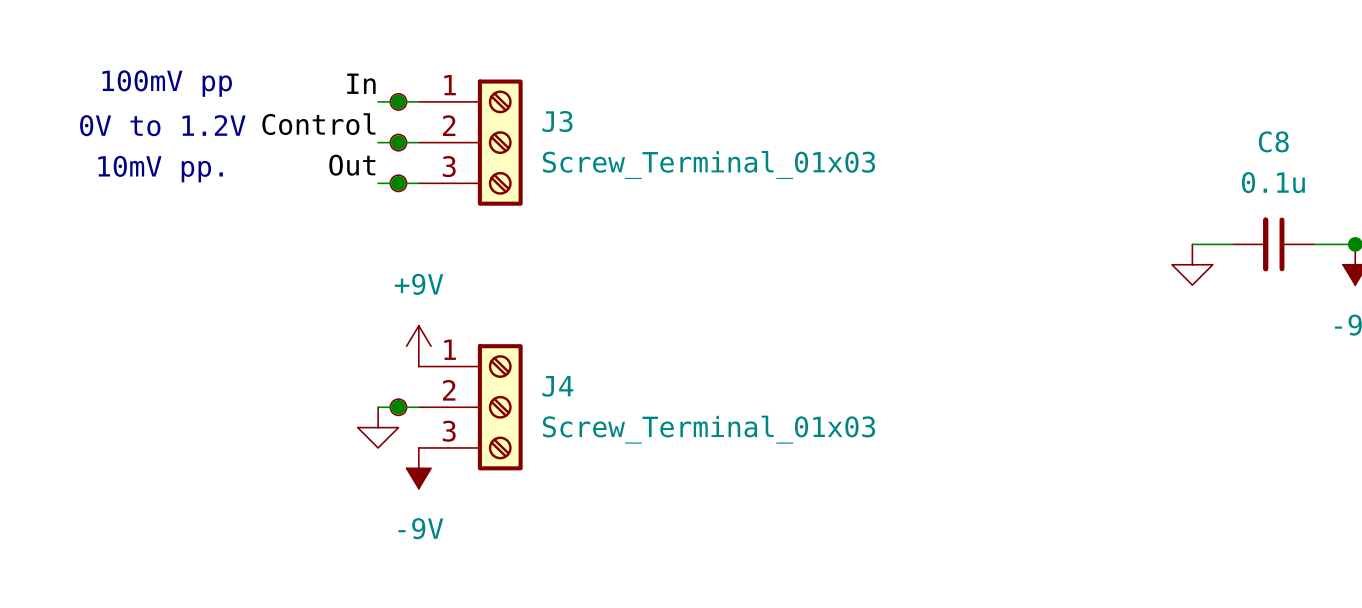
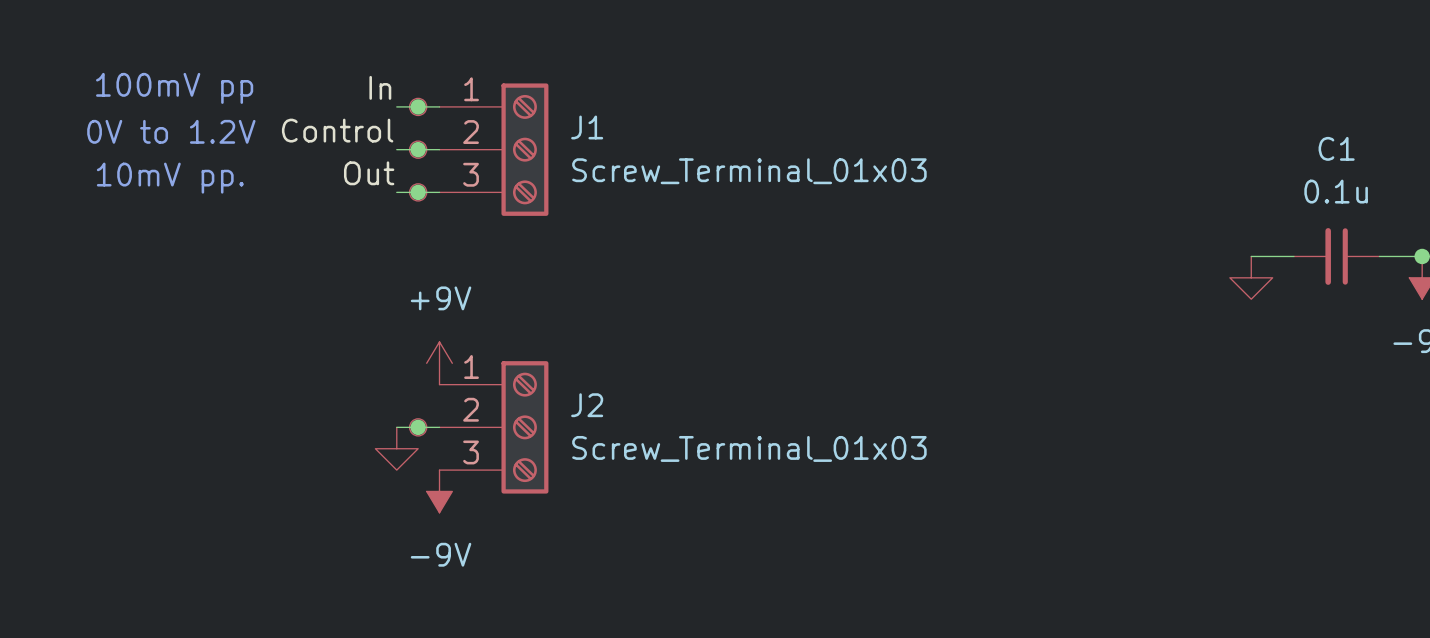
J3 name: J3 (557, 121) -> J1 (587, 127)
C8 name: C8 (1273, 141) -> C1 (1336, 148)
J4 name: J4 (557, 386) -> J2 (587, 405)

